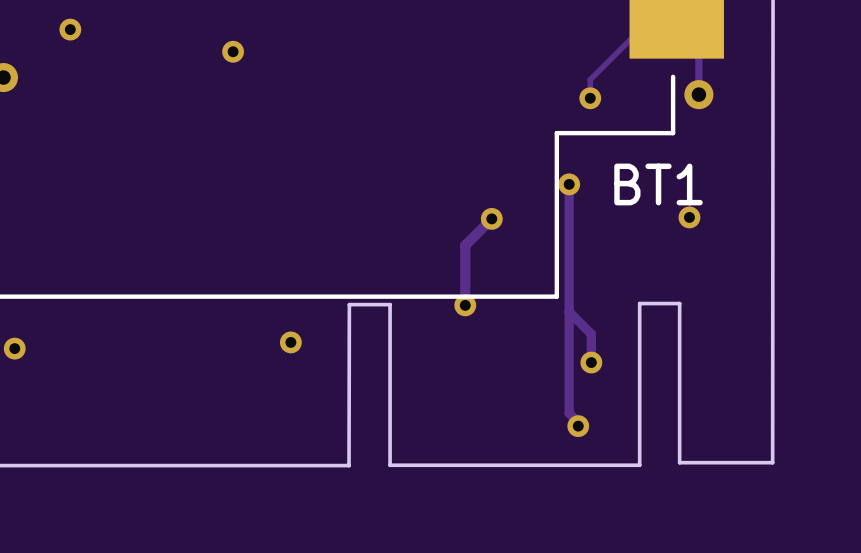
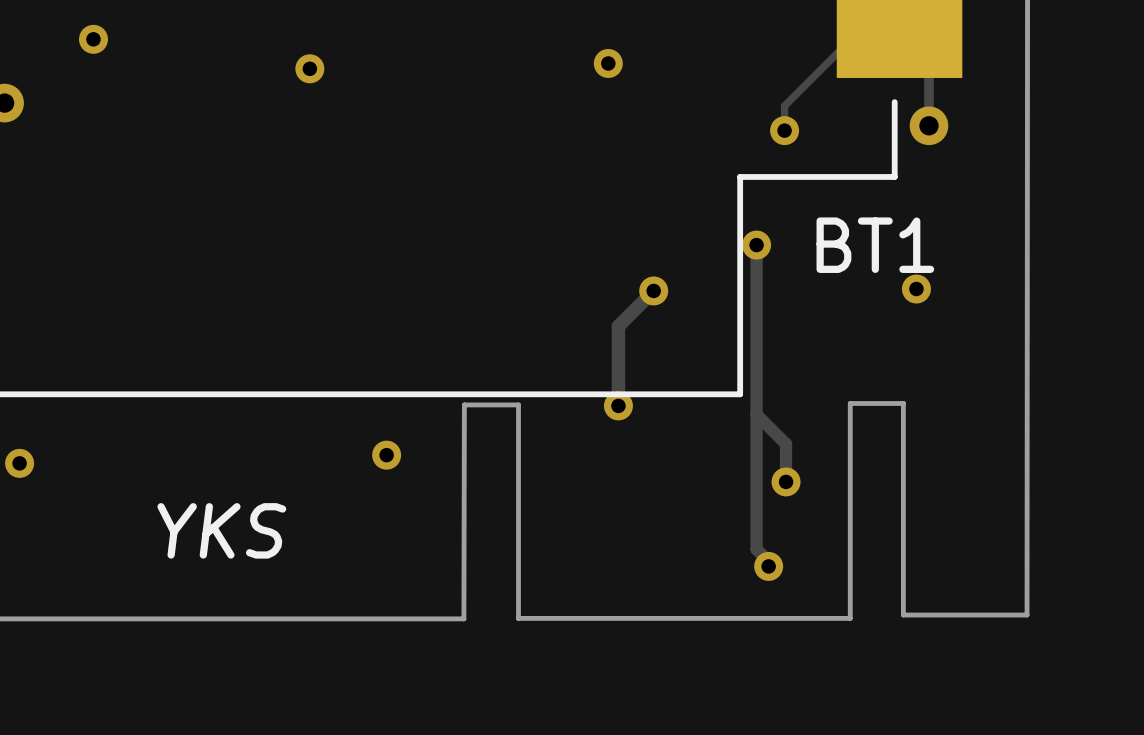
via: none -> (608, 63)
text: none -> YKS (221, 530)

